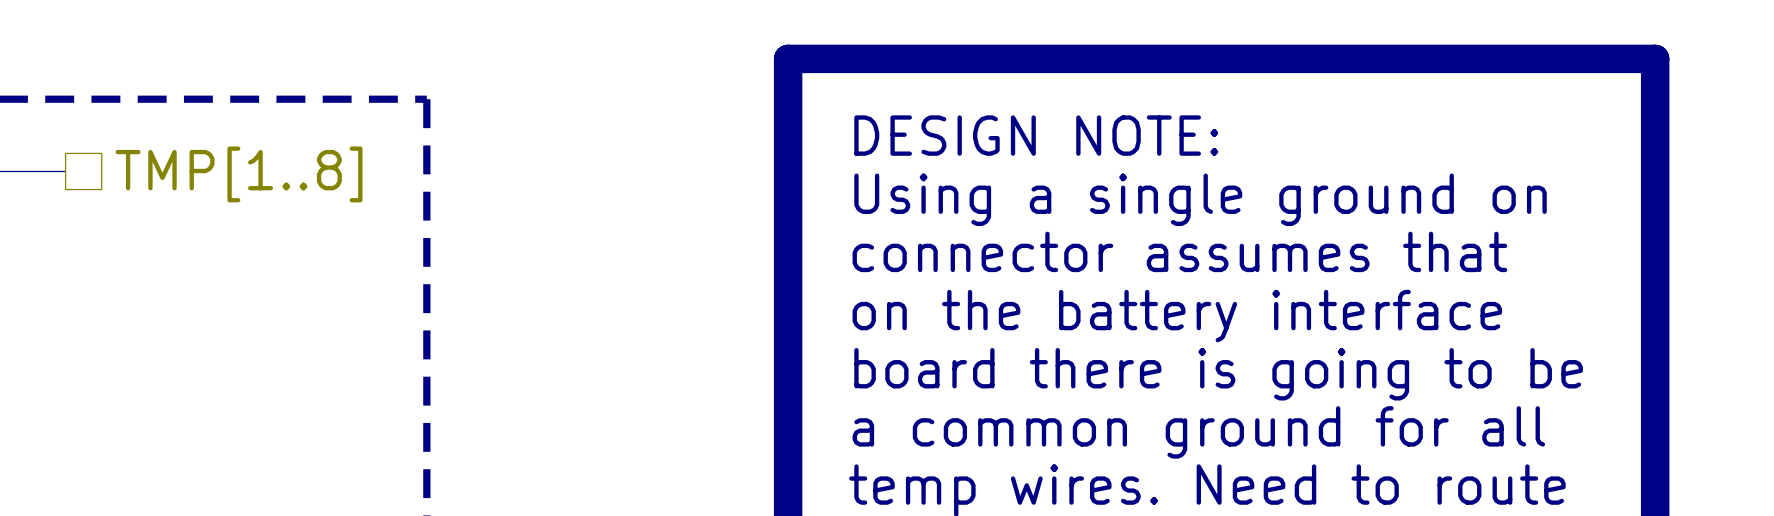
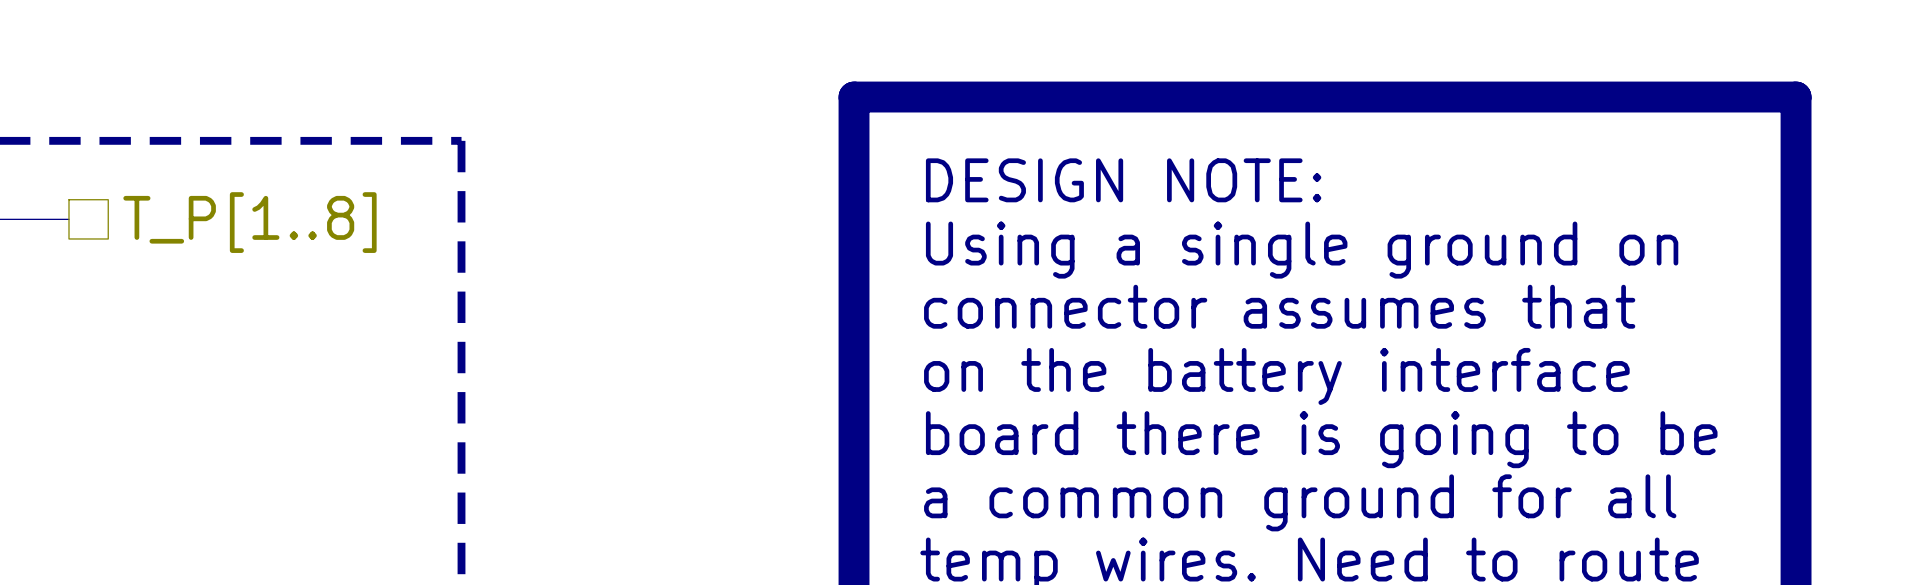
hierarchical label: TMP[1..8] (239, 174) -> T_P[1..8] (249, 222)

